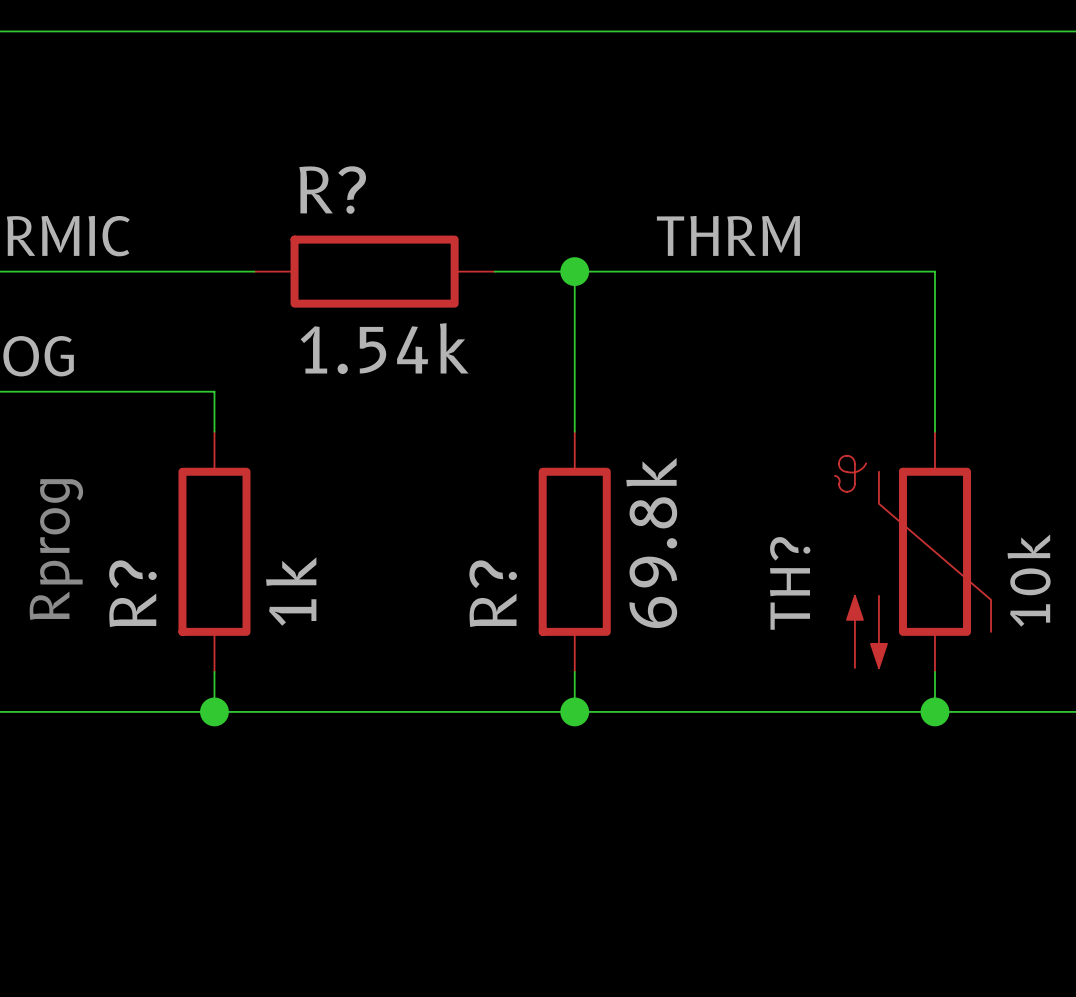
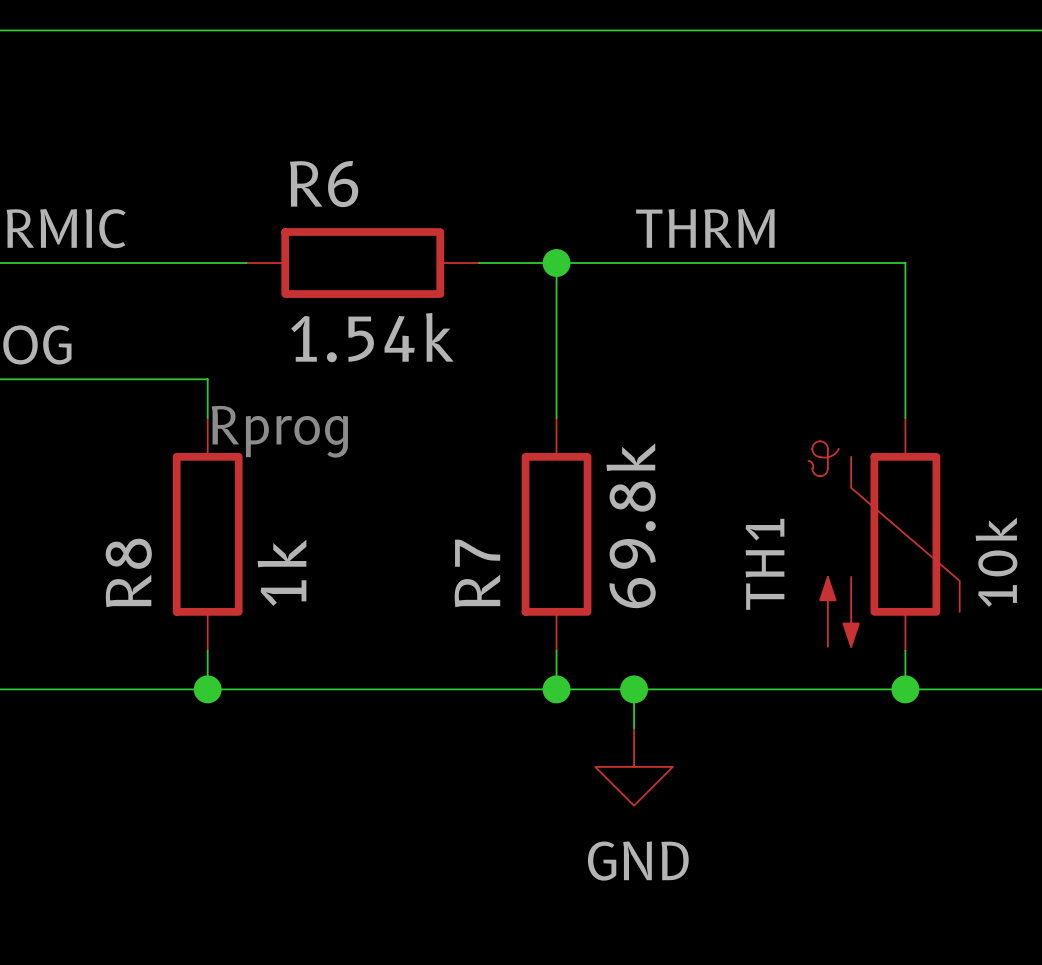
R? name: R? (332, 190) -> R6 (324, 184)
text rotation: 0° (56, 549) -> 90° clockwise (279, 431)
text position: Rprog (56, 549) -> Rprog (279, 431)
TH? name: TH? (790, 583) -> TH1 (764, 564)
R? name: R? (132, 593) -> R8 (128, 572)
R? name: R? (493, 593) -> R7 (477, 573)
wire: none -> (634, 689) (634, 728)
junction: none -> (634, 689)
power symbol: none -> GND (634, 766)

